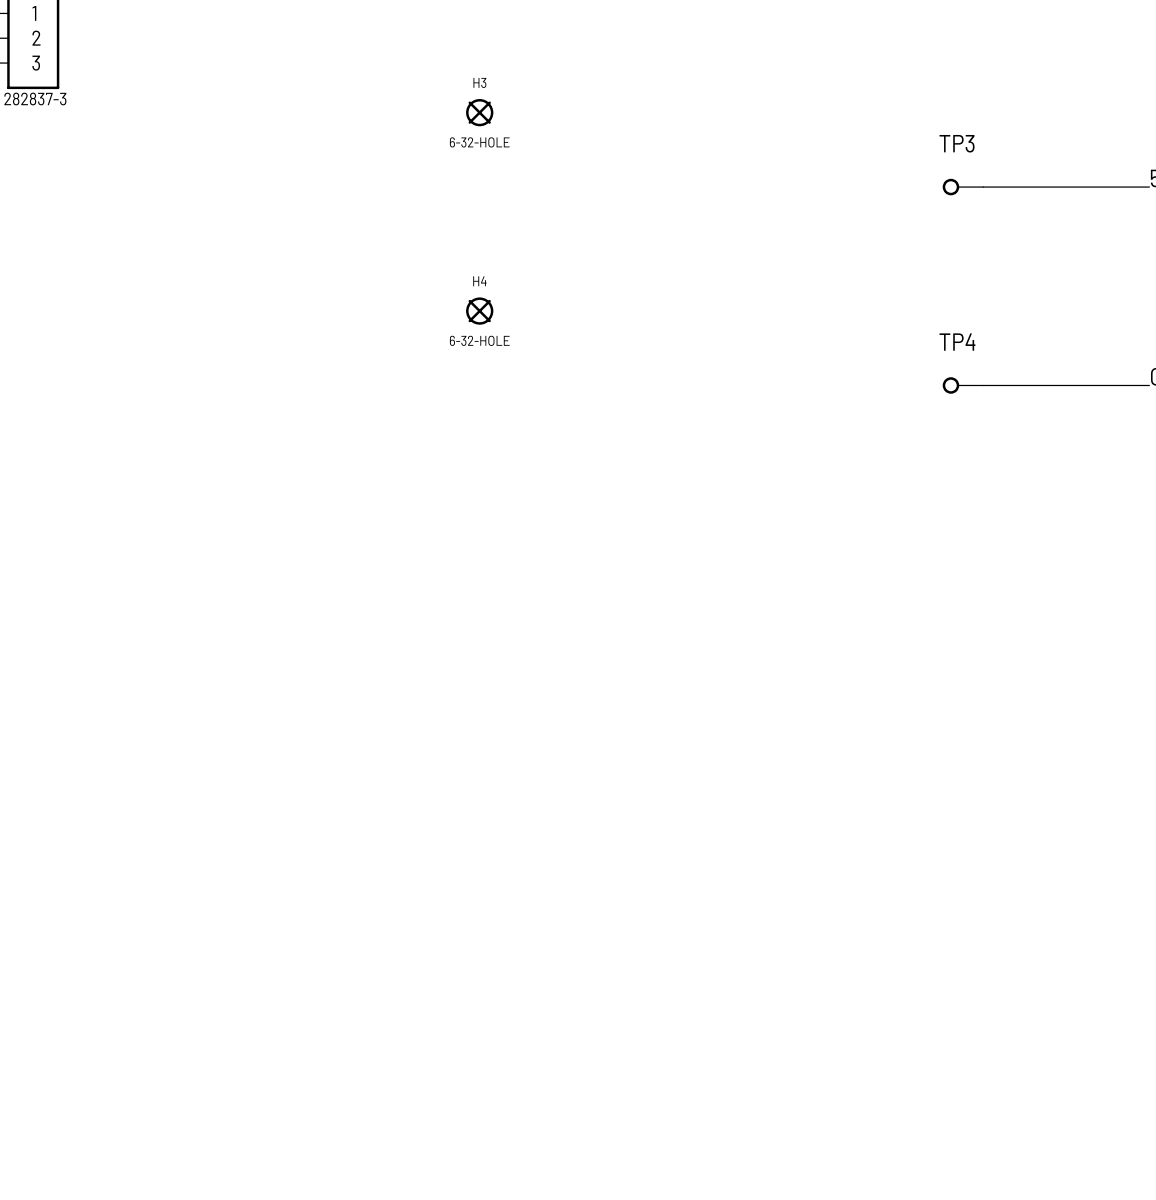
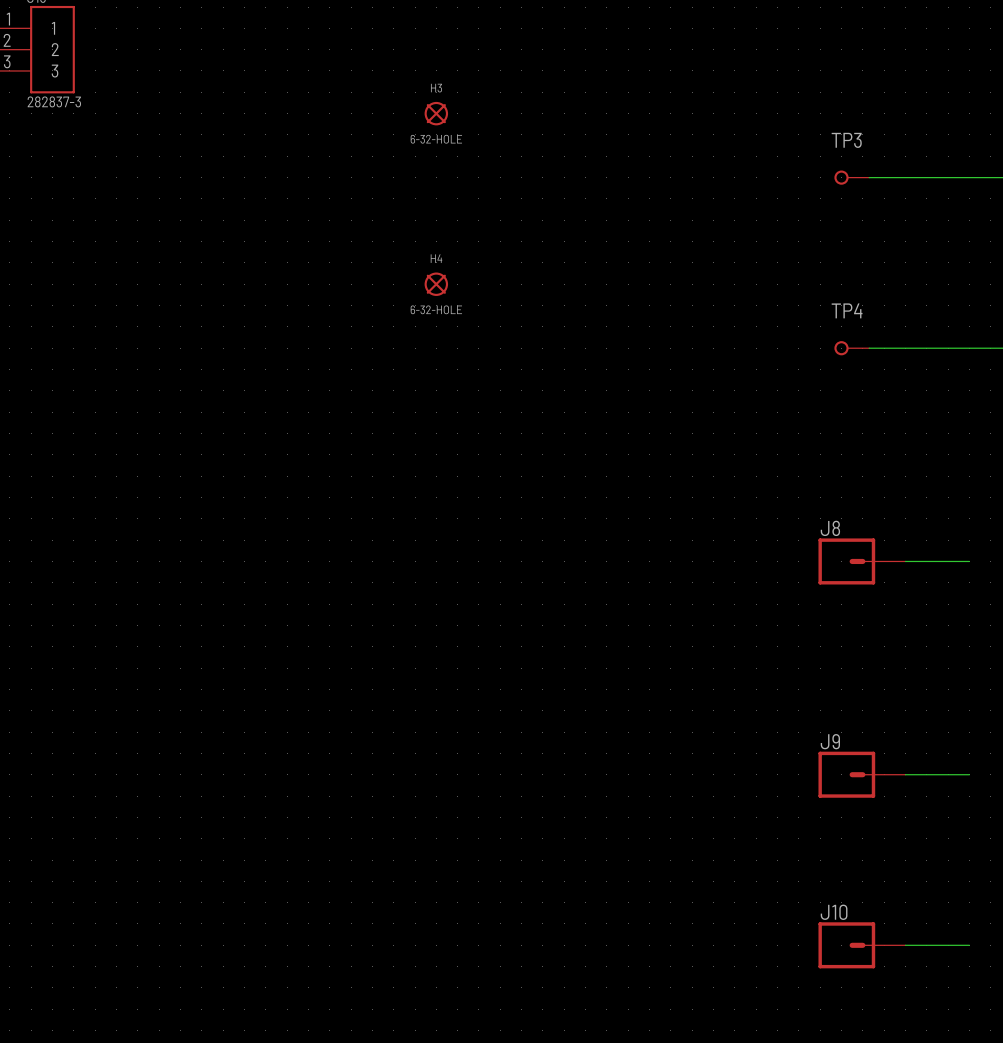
J8: none -> (861, 561)
wire: none -> (905, 561) (969, 561)
J9: none -> (861, 774)
wire: none -> (905, 774) (969, 774)
J10: none -> (861, 945)
wire: none -> (905, 945) (969, 945)

